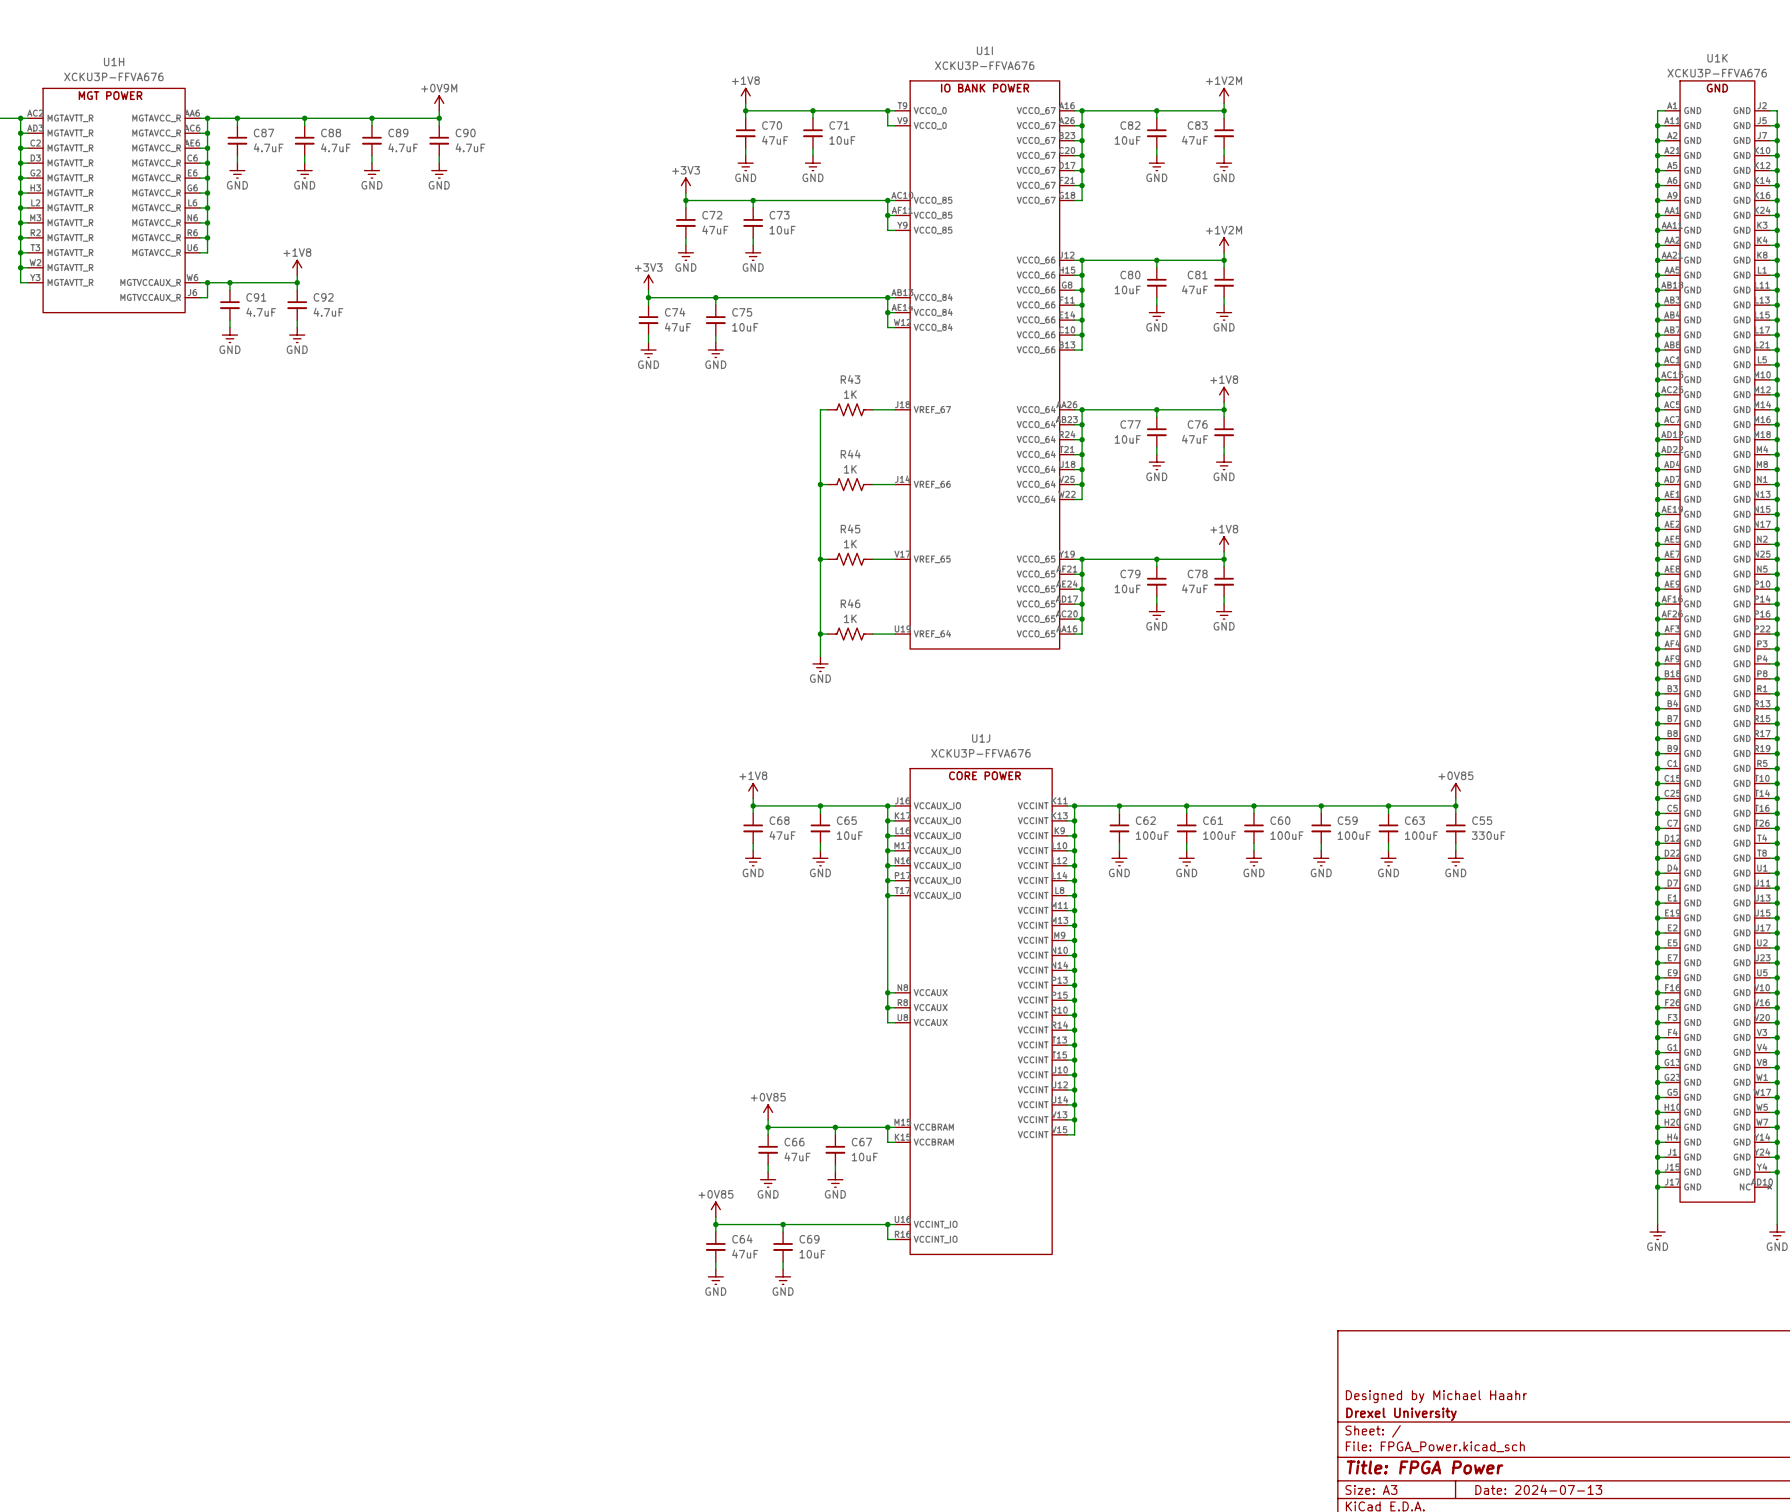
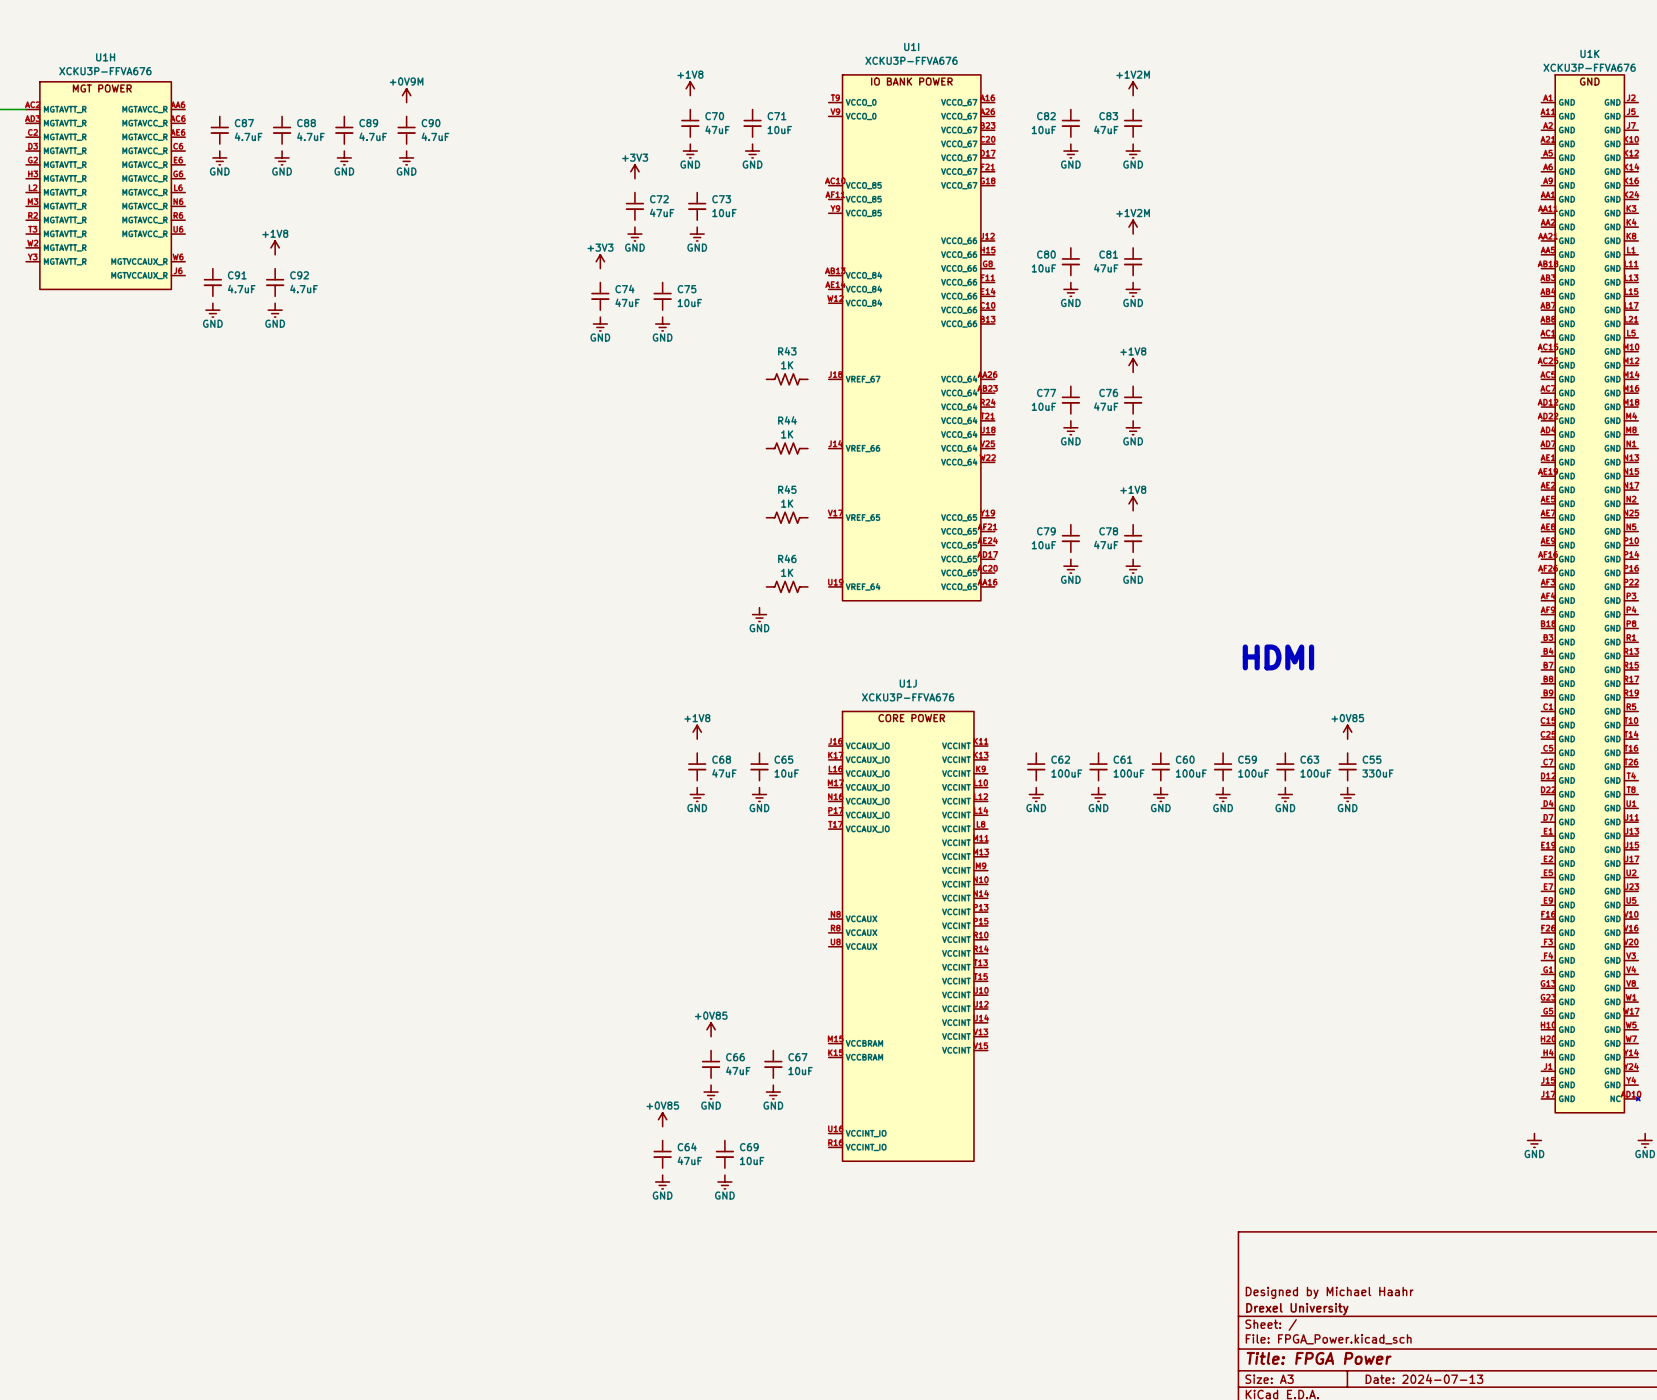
wire: (745, 103) (745, 118) -> none
wire: (1224, 103) (1224, 118) -> none
wire: (439, 110) (439, 125) -> none
wire: (745, 110) (895, 110) -> none
junction: (745, 110) -> none
wire: (812, 110) (812, 118) -> none
junction: (812, 110) -> none
wire: (887, 110) (887, 125) (895, 125) -> none
junction: (887, 110) -> none
wire: (1074, 110) (1224, 110) -> none
wire: (1082, 110) (1082, 200) (1074, 200) -> none
junction: (1082, 110) -> none
wire: (1156, 110) (1156, 118) -> none
junction: (1156, 110) -> none
junction: (1224, 110) -> none
wire: (1665, 110) (1657, 110) (1657, 1224) -> none
wire: (1769, 110) (1777, 110) (1777, 1224) -> none
wire: (20, 118) (20, 282) (28, 282) -> none
junction: (20, 118) -> none
wire: (200, 118) (439, 118) -> none
wire: (207, 118) (207, 252) (200, 252) -> none
junction: (207, 118) -> none
wire: (237, 118) (237, 125) -> none
junction: (237, 118) -> none
wire: (304, 118) (304, 125) -> none
junction: (304, 118) -> none
wire: (371, 118) (371, 125) -> none
junction: (371, 118) -> none
junction: (439, 118) -> none
wire: (1074, 125) (1082, 125) -> none
junction: (1082, 125) -> none
wire: (1657, 125) (1665, 125) -> none
junction: (1657, 125) -> none
wire: (1769, 125) (1777, 125) -> none
junction: (1777, 125) -> none
wire: (20, 133) (28, 133) -> none
junction: (20, 133) -> none
wire: (200, 133) (207, 133) -> none
junction: (207, 133) -> none
wire: (1074, 140) (1082, 140) -> none
junction: (1082, 140) -> none
wire: (1657, 140) (1665, 140) -> none
junction: (1657, 140) -> none
wire: (1769, 140) (1777, 140) -> none
junction: (1777, 140) -> none
wire: (20, 148) (28, 148) -> none
junction: (20, 148) -> none
wire: (200, 148) (207, 148) -> none
junction: (207, 148) -> none
wire: (745, 148) (745, 155) -> none
wire: (812, 148) (812, 155) -> none
wire: (1156, 148) (1156, 155) -> none
wire: (1224, 148) (1224, 155) -> none
wire: (237, 155) (237, 163) -> none
wire: (304, 155) (304, 163) -> none
wire: (371, 155) (371, 163) -> none
wire: (439, 155) (439, 163) -> none
wire: (1074, 155) (1082, 155) -> none
junction: (1082, 155) -> none
wire: (1657, 155) (1665, 155) -> none
junction: (1657, 155) -> none
wire: (1769, 155) (1777, 155) -> none
junction: (1777, 155) -> none
wire: (20, 163) (28, 163) -> none
junction: (20, 163) -> none
wire: (200, 163) (207, 163) -> none
junction: (207, 163) -> none
wire: (1074, 170) (1082, 170) -> none
junction: (1082, 170) -> none
wire: (1657, 170) (1665, 170) -> none
junction: (1657, 170) -> none
wire: (1769, 170) (1777, 170) -> none
junction: (1777, 170) -> none
wire: (20, 178) (28, 178) -> none
junction: (20, 178) -> none
wire: (200, 178) (207, 178) -> none
junction: (207, 178) -> none
wire: (1074, 185) (1082, 185) -> none
junction: (1082, 185) -> none
wire: (1657, 185) (1665, 185) -> none
junction: (1657, 185) -> none
wire: (1769, 185) (1777, 185) -> none
junction: (1777, 185) -> none
wire: (20, 193) (28, 193) -> none
junction: (20, 193) -> none
wire: (200, 193) (207, 193) -> none
junction: (207, 193) -> none
wire: (685, 193) (685, 207) -> none
wire: (685, 200) (895, 200) -> none
junction: (685, 200) -> none
wire: (753, 200) (753, 207) -> none
junction: (753, 200) -> none
wire: (887, 200) (887, 230) (895, 230) -> none
junction: (887, 200) -> none
wire: (1657, 200) (1665, 200) -> none
junction: (1657, 200) -> none
wire: (1769, 200) (1777, 200) -> none
junction: (1777, 200) -> none
wire: (20, 207) (28, 207) -> none
junction: (20, 207) -> none
wire: (200, 207) (207, 207) -> none
junction: (207, 207) -> none
wire: (887, 215) (895, 215) -> none
junction: (887, 215) -> none
wire: (1657, 215) (1665, 215) -> none
junction: (1657, 215) -> none
wire: (1769, 215) (1777, 215) -> none
junction: (1777, 215) -> none
wire: (20, 222) (28, 222) -> none
junction: (20, 222) -> none
wire: (200, 222) (207, 222) -> none
junction: (207, 222) -> none
wire: (1657, 230) (1665, 230) -> none
junction: (1657, 230) -> none
wire: (1769, 230) (1777, 230) -> none
junction: (1777, 230) -> none
wire: (20, 237) (28, 237) -> none
junction: (20, 237) -> none
wire: (200, 237) (207, 237) -> none
junction: (207, 237) -> none
wire: (685, 237) (685, 245) -> none
wire: (753, 237) (753, 245) -> none
wire: (1657, 245) (1665, 245) -> none
junction: (1657, 245) -> none
wire: (1769, 245) (1777, 245) -> none
junction: (1777, 245) -> none
wire: (20, 252) (28, 252) -> none
junction: (20, 252) -> none
wire: (1224, 252) (1224, 267) -> none
wire: (1074, 260) (1224, 260) -> none
wire: (1082, 260) (1082, 350) (1074, 350) -> none
junction: (1082, 260) -> none
wire: (1156, 260) (1156, 267) -> none
junction: (1156, 260) -> none
junction: (1224, 260) -> none
wire: (1657, 260) (1665, 260) -> none
junction: (1657, 260) -> none
wire: (1769, 260) (1777, 260) -> none
junction: (1777, 260) -> none
wire: (20, 267) (28, 267) -> none
junction: (20, 267) -> none
wire: (297, 275) (297, 290) -> none
wire: (1074, 275) (1082, 275) -> none
junction: (1082, 275) -> none
wire: (1657, 275) (1665, 275) -> none
junction: (1657, 275) -> none
wire: (1769, 275) (1777, 275) -> none
junction: (1777, 275) -> none
wire: (200, 282) (297, 282) -> none
wire: (207, 282) (207, 297) (200, 297) -> none
junction: (207, 282) -> none
wire: (229, 282) (229, 290) -> none
junction: (229, 282) -> none
junction: (297, 282) -> none
wire: (648, 290) (648, 305) -> none
wire: (1074, 290) (1082, 290) -> none
junction: (1082, 290) -> none
wire: (1657, 290) (1665, 290) -> none
junction: (1657, 290) -> none
wire: (1769, 290) (1777, 290) -> none
junction: (1777, 290) -> none
wire: (648, 297) (895, 297) -> none
junction: (648, 297) -> none
wire: (715, 297) (715, 305) -> none
junction: (715, 297) -> none
wire: (887, 297) (887, 327) (895, 327) -> none
junction: (887, 297) -> none
wire: (1156, 297) (1156, 305) -> none
wire: (1224, 297) (1224, 305) -> none
wire: (1074, 305) (1082, 305) -> none
junction: (1082, 305) -> none
wire: (1657, 305) (1665, 305) -> none
junction: (1657, 305) -> none
wire: (1769, 305) (1777, 305) -> none
junction: (1777, 305) -> none
wire: (887, 312) (895, 312) -> none
junction: (887, 312) -> none
wire: (229, 320) (229, 327) -> none
wire: (297, 320) (297, 327) -> none
wire: (1074, 320) (1082, 320) -> none
junction: (1082, 320) -> none
wire: (1657, 320) (1665, 320) -> none
junction: (1657, 320) -> none
wire: (1769, 320) (1777, 320) -> none
junction: (1777, 320) -> none
wire: (648, 335) (648, 342) -> none
wire: (715, 335) (715, 342) -> none
wire: (1074, 335) (1082, 335) -> none
junction: (1082, 335) -> none
wire: (1657, 335) (1665, 335) -> none
junction: (1657, 335) -> none
wire: (1769, 335) (1777, 335) -> none
junction: (1777, 335) -> none
wire: (1657, 350) (1665, 350) -> none
junction: (1657, 350) -> none
wire: (1769, 350) (1777, 350) -> none
junction: (1777, 350) -> none
wire: (1657, 364) (1665, 364) -> none
junction: (1657, 364) -> none
wire: (1769, 364) (1777, 364) -> none
junction: (1777, 364) -> none
wire: (1657, 379) (1665, 379) -> none
junction: (1657, 379) -> none
wire: (1769, 379) (1777, 379) -> none
junction: (1777, 379) -> none
wire: (1657, 394) (1665, 394) -> none
junction: (1657, 394) -> none
wire: (1769, 394) (1777, 394) -> none
junction: (1777, 394) -> none
wire: (1224, 402) (1224, 417) -> none
wire: (827, 409) (820, 409) (820, 656) -> none
wire: (872, 409) (895, 409) -> none
wire: (1074, 409) (1224, 409) -> none
wire: (1082, 409) (1082, 499) (1074, 499) -> none
junction: (1082, 409) -> none
wire: (1156, 409) (1156, 417) -> none
junction: (1156, 409) -> none
junction: (1224, 409) -> none
wire: (1657, 409) (1665, 409) -> none
junction: (1657, 409) -> none
wire: (1769, 409) (1777, 409) -> none
junction: (1777, 409) -> none
wire: (1074, 424) (1082, 424) -> none
junction: (1082, 424) -> none
wire: (1657, 424) (1665, 424) -> none
junction: (1657, 424) -> none
wire: (1769, 424) (1777, 424) -> none
junction: (1777, 424) -> none
wire: (1074, 439) (1082, 439) -> none
junction: (1082, 439) -> none
wire: (1657, 439) (1665, 439) -> none
junction: (1657, 439) -> none
wire: (1769, 439) (1777, 439) -> none
junction: (1777, 439) -> none
wire: (1156, 447) (1156, 454) -> none
wire: (1224, 447) (1224, 454) -> none
wire: (1074, 454) (1082, 454) -> none
junction: (1082, 454) -> none
wire: (1657, 454) (1665, 454) -> none
junction: (1657, 454) -> none
wire: (1769, 454) (1777, 454) -> none
junction: (1777, 454) -> none
wire: (1074, 469) (1082, 469) -> none
junction: (1082, 469) -> none
wire: (1657, 469) (1665, 469) -> none
junction: (1657, 469) -> none
wire: (1769, 469) (1777, 469) -> none
junction: (1777, 469) -> none
wire: (820, 484) (827, 484) -> none
junction: (820, 484) -> none
wire: (872, 484) (895, 484) -> none
wire: (1074, 484) (1082, 484) -> none
junction: (1082, 484) -> none
wire: (1657, 484) (1665, 484) -> none
junction: (1657, 484) -> none
wire: (1769, 484) (1777, 484) -> none
junction: (1777, 484) -> none
wire: (1657, 499) (1665, 499) -> none
junction: (1657, 499) -> none
wire: (1769, 499) (1777, 499) -> none
junction: (1777, 499) -> none
wire: (1657, 514) (1665, 514) -> none
junction: (1657, 514) -> none
wire: (1769, 514) (1777, 514) -> none
junction: (1777, 514) -> none
wire: (1657, 529) (1665, 529) -> none
junction: (1657, 529) -> none
wire: (1769, 529) (1777, 529) -> none
junction: (1777, 529) -> none
wire: (1657, 544) (1665, 544) -> none
junction: (1657, 544) -> none
wire: (1769, 544) (1777, 544) -> none
junction: (1777, 544) -> none
wire: (1224, 551) (1224, 566) -> none
wire: (820, 559) (827, 559) -> none
junction: (820, 559) -> none
wire: (872, 559) (895, 559) -> none
wire: (1074, 559) (1224, 559) -> none
wire: (1082, 559) (1082, 634) (1074, 634) -> none
junction: (1082, 559) -> none
wire: (1156, 559) (1156, 566) -> none
junction: (1156, 559) -> none
junction: (1224, 559) -> none
wire: (1657, 559) (1665, 559) -> none
junction: (1657, 559) -> none
wire: (1769, 559) (1777, 559) -> none
junction: (1777, 559) -> none
wire: (1074, 574) (1082, 574) -> none
junction: (1082, 574) -> none
wire: (1657, 574) (1665, 574) -> none
junction: (1657, 574) -> none
wire: (1769, 574) (1777, 574) -> none
junction: (1777, 574) -> none
wire: (1074, 589) (1082, 589) -> none
junction: (1082, 589) -> none
wire: (1657, 589) (1665, 589) -> none
junction: (1657, 589) -> none
wire: (1769, 589) (1777, 589) -> none
junction: (1777, 589) -> none
wire: (1156, 596) (1156, 604) -> none
wire: (1224, 596) (1224, 604) -> none
wire: (1074, 604) (1082, 604) -> none
junction: (1082, 604) -> none
wire: (1657, 604) (1665, 604) -> none
junction: (1657, 604) -> none
wire: (1769, 604) (1777, 604) -> none
junction: (1777, 604) -> none
wire: (1074, 619) (1082, 619) -> none
junction: (1082, 619) -> none
wire: (1657, 619) (1665, 619) -> none
junction: (1657, 619) -> none
wire: (1769, 619) (1777, 619) -> none
junction: (1777, 619) -> none
wire: (820, 634) (827, 634) -> none
junction: (820, 634) -> none
wire: (872, 634) (895, 634) -> none
wire: (1657, 634) (1665, 634) -> none
junction: (1657, 634) -> none
wire: (1769, 634) (1777, 634) -> none
junction: (1777, 634) -> none
wire: (1657, 648) (1665, 648) -> none
junction: (1657, 648) -> none
wire: (1769, 648) (1777, 648) -> none
junction: (1777, 648) -> none
wire: (1657, 663) (1665, 663) -> none
junction: (1657, 663) -> none
wire: (1769, 663) (1777, 663) -> none
junction: (1777, 663) -> none
wire: (1657, 678) (1665, 678) -> none
junction: (1657, 678) -> none
wire: (1769, 678) (1777, 678) -> none
junction: (1777, 678) -> none
wire: (1657, 693) (1665, 693) -> none
junction: (1657, 693) -> none
wire: (1769, 693) (1777, 693) -> none
junction: (1777, 693) -> none
wire: (1657, 708) (1665, 708) -> none
junction: (1657, 708) -> none
wire: (1769, 708) (1777, 708) -> none
junction: (1777, 708) -> none
text: none -> HDMI (1278, 657)
wire: (1657, 723) (1665, 723) -> none
junction: (1657, 723) -> none
wire: (1769, 723) (1777, 723) -> none
junction: (1777, 723) -> none
wire: (1657, 738) (1665, 738) -> none
junction: (1657, 738) -> none
wire: (1769, 738) (1777, 738) -> none
junction: (1777, 738) -> none
wire: (1657, 753) (1665, 753) -> none
junction: (1657, 753) -> none
wire: (1769, 753) (1777, 753) -> none
junction: (1777, 753) -> none
wire: (1657, 768) (1665, 768) -> none
junction: (1657, 768) -> none
wire: (1769, 768) (1777, 768) -> none
junction: (1777, 768) -> none
wire: (1657, 783) (1665, 783) -> none
junction: (1657, 783) -> none
wire: (1769, 783) (1777, 783) -> none
junction: (1777, 783) -> none
wire: (753, 798) (753, 813) -> none
wire: (1455, 798) (1455, 813) -> none
wire: (1657, 798) (1665, 798) -> none
junction: (1657, 798) -> none
wire: (1769, 798) (1777, 798) -> none
junction: (1777, 798) -> none
wire: (753, 805) (895, 805) -> none
junction: (753, 805) -> none
wire: (820, 805) (820, 813) -> none
junction: (820, 805) -> none
wire: (887, 805) (887, 1022) (895, 1022) -> none
junction: (887, 805) -> none
wire: (1067, 805) (1455, 805) -> none
wire: (1074, 805) (1074, 1134) (1067, 1134) -> none
junction: (1074, 805) -> none
wire: (1119, 805) (1119, 813) -> none
junction: (1119, 805) -> none
wire: (1186, 805) (1186, 813) -> none
junction: (1186, 805) -> none
wire: (1253, 805) (1253, 813) -> none
junction: (1253, 805) -> none
wire: (1321, 805) (1321, 813) -> none
junction: (1321, 805) -> none
wire: (1388, 805) (1388, 813) -> none
junction: (1388, 805) -> none
junction: (1455, 805) -> none
wire: (1657, 813) (1665, 813) -> none
junction: (1657, 813) -> none
wire: (1769, 813) (1777, 813) -> none
junction: (1777, 813) -> none
wire: (887, 820) (895, 820) -> none
junction: (887, 820) -> none
wire: (1067, 820) (1074, 820) -> none
junction: (1074, 820) -> none
wire: (1657, 828) (1665, 828) -> none
junction: (1657, 828) -> none
wire: (1769, 828) (1777, 828) -> none
junction: (1777, 828) -> none
wire: (887, 835) (895, 835) -> none
junction: (887, 835) -> none
wire: (1067, 835) (1074, 835) -> none
junction: (1074, 835) -> none
wire: (753, 843) (753, 850) -> none
wire: (820, 843) (820, 850) -> none
wire: (1119, 843) (1119, 850) -> none
wire: (1186, 843) (1186, 850) -> none
wire: (1253, 843) (1253, 850) -> none
wire: (1321, 843) (1321, 850) -> none
wire: (1388, 843) (1388, 850) -> none
wire: (1455, 843) (1455, 850) -> none
wire: (1657, 843) (1665, 843) -> none
junction: (1657, 843) -> none
wire: (1769, 843) (1777, 843) -> none
junction: (1777, 843) -> none
wire: (887, 850) (895, 850) -> none
junction: (887, 850) -> none
wire: (1067, 850) (1074, 850) -> none
junction: (1074, 850) -> none
wire: (1657, 858) (1665, 858) -> none
junction: (1657, 858) -> none
wire: (1769, 858) (1777, 858) -> none
junction: (1777, 858) -> none
wire: (887, 865) (895, 865) -> none
junction: (887, 865) -> none
wire: (1067, 865) (1074, 865) -> none
junction: (1074, 865) -> none
wire: (1657, 873) (1665, 873) -> none
junction: (1657, 873) -> none
wire: (1769, 873) (1777, 873) -> none
junction: (1777, 873) -> none
wire: (887, 880) (895, 880) -> none
junction: (887, 880) -> none
wire: (1067, 880) (1074, 880) -> none
junction: (1074, 880) -> none
wire: (1657, 888) (1665, 888) -> none
junction: (1657, 888) -> none
wire: (1769, 888) (1777, 888) -> none
junction: (1777, 888) -> none
wire: (887, 895) (895, 895) -> none
junction: (887, 895) -> none
wire: (1067, 895) (1074, 895) -> none
junction: (1074, 895) -> none
wire: (1657, 903) (1665, 903) -> none
junction: (1657, 903) -> none
wire: (1769, 903) (1777, 903) -> none
junction: (1777, 903) -> none
wire: (1067, 910) (1074, 910) -> none
junction: (1074, 910) -> none
wire: (1657, 918) (1665, 918) -> none
junction: (1657, 918) -> none
wire: (1769, 918) (1777, 918) -> none
junction: (1777, 918) -> none
wire: (1067, 925) (1074, 925) -> none
junction: (1074, 925) -> none
wire: (1657, 933) (1665, 933) -> none
junction: (1657, 933) -> none
wire: (1769, 933) (1777, 933) -> none
junction: (1777, 933) -> none
wire: (1067, 940) (1074, 940) -> none
junction: (1074, 940) -> none
wire: (1657, 947) (1665, 947) -> none
junction: (1657, 947) -> none
wire: (1769, 947) (1777, 947) -> none
junction: (1777, 947) -> none
wire: (1067, 955) (1074, 955) -> none
junction: (1074, 955) -> none
wire: (1657, 962) (1665, 962) -> none
junction: (1657, 962) -> none
wire: (1769, 962) (1777, 962) -> none
junction: (1777, 962) -> none
wire: (1067, 970) (1074, 970) -> none
junction: (1074, 970) -> none
wire: (1657, 977) (1665, 977) -> none
junction: (1657, 977) -> none
wire: (1769, 977) (1777, 977) -> none
junction: (1777, 977) -> none
wire: (1067, 985) (1074, 985) -> none
junction: (1074, 985) -> none
wire: (887, 992) (895, 992) -> none
junction: (887, 992) -> none
wire: (1657, 992) (1665, 992) -> none
junction: (1657, 992) -> none
wire: (1769, 992) (1777, 992) -> none
junction: (1777, 992) -> none
wire: (1067, 1000) (1074, 1000) -> none
junction: (1074, 1000) -> none
wire: (887, 1007) (895, 1007) -> none
junction: (887, 1007) -> none
wire: (1657, 1007) (1665, 1007) -> none
junction: (1657, 1007) -> none
wire: (1769, 1007) (1777, 1007) -> none
junction: (1777, 1007) -> none
wire: (1067, 1015) (1074, 1015) -> none
junction: (1074, 1015) -> none
wire: (1657, 1022) (1665, 1022) -> none
junction: (1657, 1022) -> none
wire: (1769, 1022) (1777, 1022) -> none
junction: (1777, 1022) -> none
wire: (1067, 1030) (1074, 1030) -> none
junction: (1074, 1030) -> none
wire: (1657, 1037) (1665, 1037) -> none
junction: (1657, 1037) -> none
wire: (1769, 1037) (1777, 1037) -> none
junction: (1777, 1037) -> none
wire: (1067, 1045) (1074, 1045) -> none
junction: (1074, 1045) -> none
wire: (1657, 1052) (1665, 1052) -> none
junction: (1657, 1052) -> none
wire: (1769, 1052) (1777, 1052) -> none
junction: (1777, 1052) -> none
wire: (1067, 1060) (1074, 1060) -> none
junction: (1074, 1060) -> none
wire: (1657, 1067) (1665, 1067) -> none
junction: (1657, 1067) -> none
wire: (1769, 1067) (1777, 1067) -> none
junction: (1777, 1067) -> none
wire: (1067, 1075) (1074, 1075) -> none
junction: (1074, 1075) -> none
wire: (1657, 1082) (1665, 1082) -> none
junction: (1657, 1082) -> none
wire: (1769, 1082) (1777, 1082) -> none
junction: (1777, 1082) -> none
wire: (1067, 1090) (1074, 1090) -> none
junction: (1074, 1090) -> none
wire: (1657, 1097) (1665, 1097) -> none
junction: (1657, 1097) -> none
wire: (1769, 1097) (1777, 1097) -> none
junction: (1777, 1097) -> none
wire: (1067, 1104) (1074, 1104) -> none
junction: (1074, 1104) -> none
wire: (1657, 1112) (1665, 1112) -> none
junction: (1657, 1112) -> none
wire: (1769, 1112) (1777, 1112) -> none
junction: (1777, 1112) -> none
wire: (768, 1119) (768, 1134) -> none
wire: (1067, 1119) (1074, 1119) -> none
junction: (1074, 1119) -> none
wire: (768, 1127) (895, 1127) -> none
junction: (768, 1127) -> none
wire: (835, 1127) (835, 1134) -> none
junction: (835, 1127) -> none
wire: (887, 1127) (887, 1142) (895, 1142) -> none
junction: (887, 1127) -> none
wire: (1657, 1127) (1665, 1127) -> none
junction: (1657, 1127) -> none
wire: (1769, 1127) (1777, 1127) -> none
junction: (1777, 1127) -> none
wire: (1657, 1142) (1665, 1142) -> none
junction: (1657, 1142) -> none
wire: (1769, 1142) (1777, 1142) -> none
junction: (1777, 1142) -> none
wire: (1657, 1157) (1665, 1157) -> none
junction: (1657, 1157) -> none
wire: (1769, 1157) (1777, 1157) -> none
junction: (1777, 1157) -> none
wire: (768, 1164) (768, 1172) -> none
wire: (835, 1164) (835, 1172) -> none
wire: (1657, 1172) (1665, 1172) -> none
junction: (1657, 1172) -> none
wire: (1769, 1172) (1777, 1172) -> none
junction: (1777, 1172) -> none
wire: (1657, 1187) (1665, 1187) -> none
junction: (1657, 1187) -> none
wire: (715, 1217) (715, 1232) -> none
wire: (715, 1224) (895, 1224) -> none
junction: (715, 1224) -> none
wire: (783, 1224) (783, 1232) -> none
junction: (783, 1224) -> none
wire: (887, 1224) (887, 1239) (895, 1239) -> none
junction: (887, 1224) -> none
wire: (715, 1261) (715, 1269) -> none
wire: (783, 1261) (783, 1269) -> none

